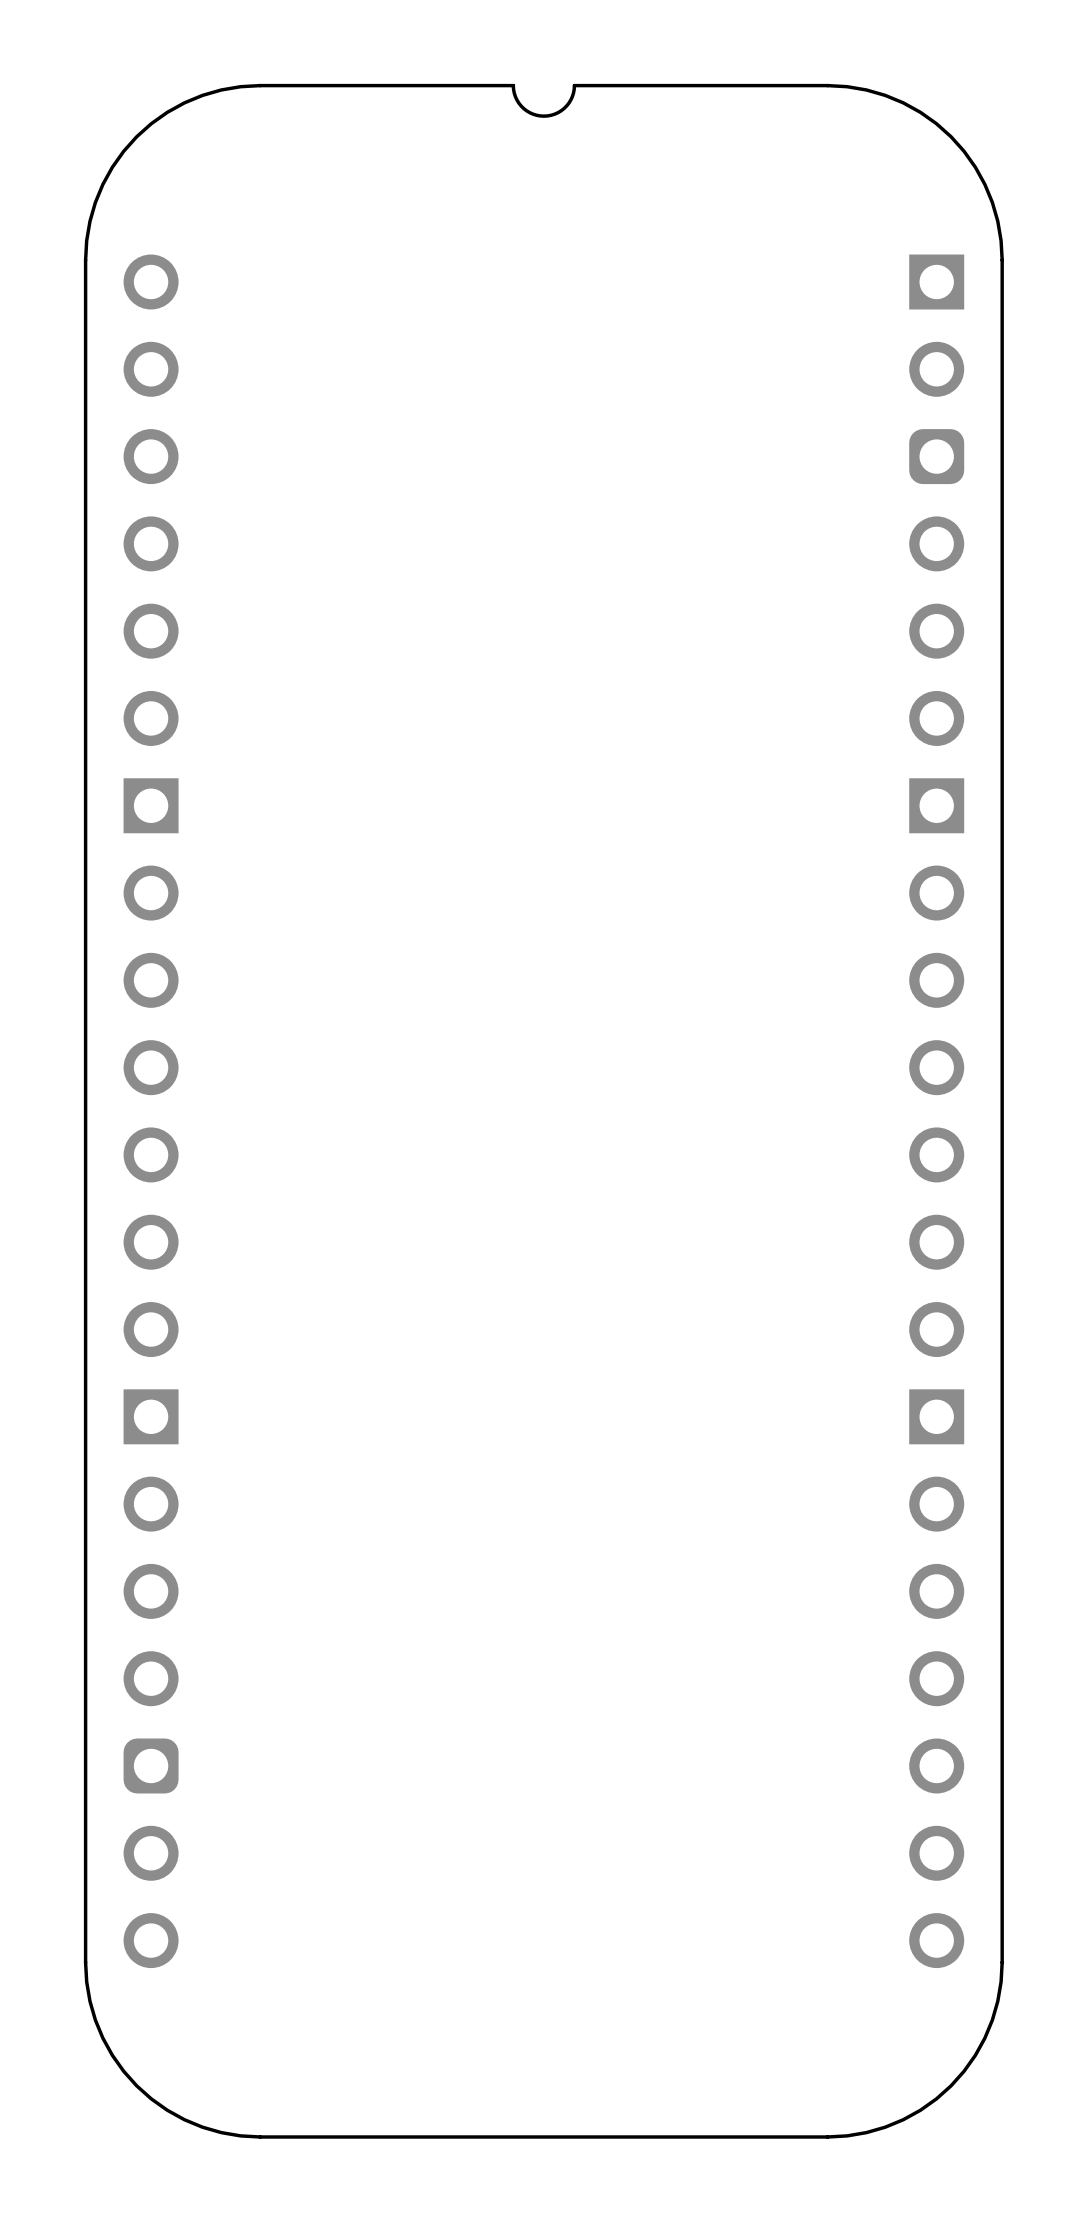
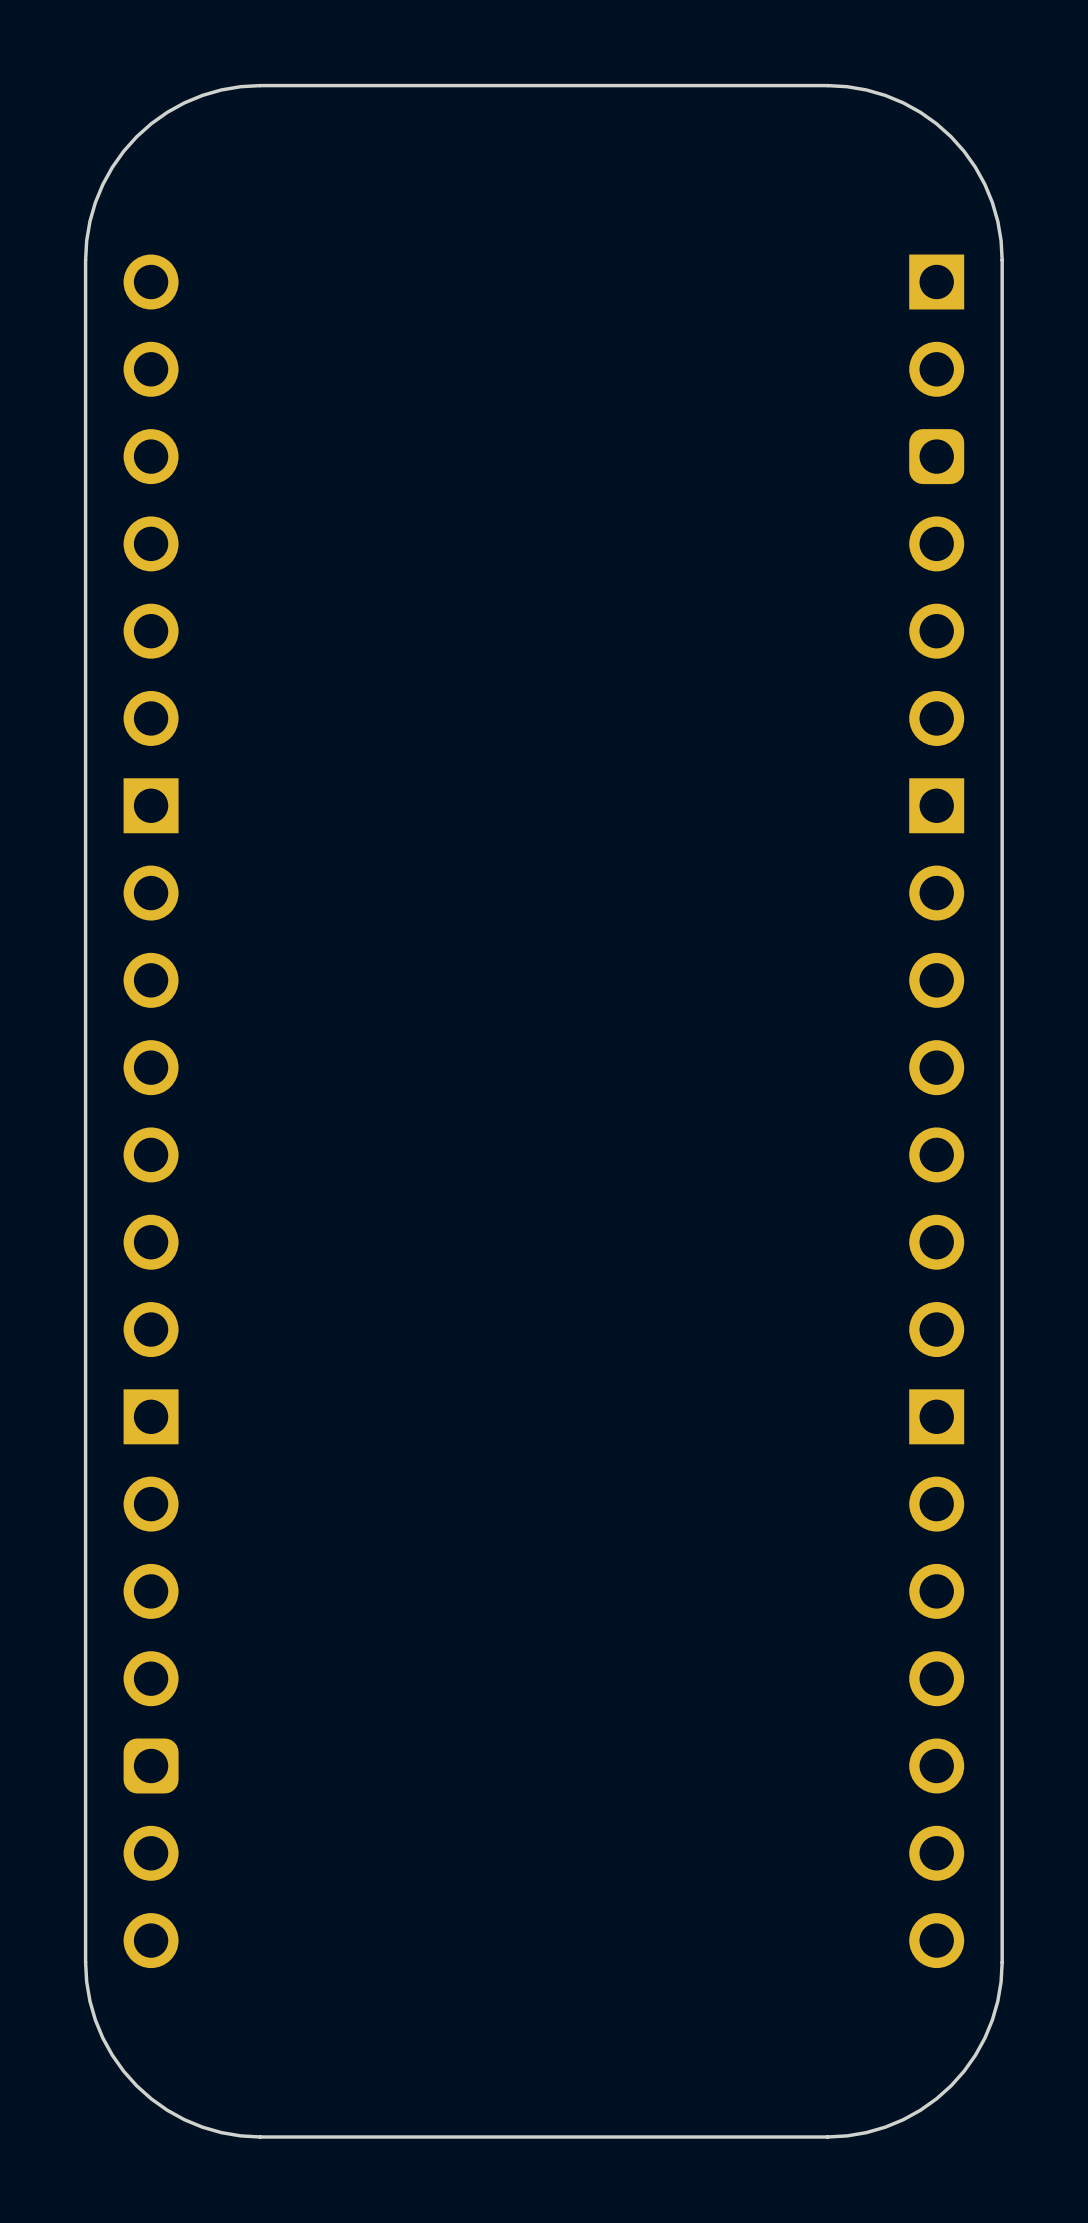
part footprint: [83, 83, 1004, 2139] -> [83, 83, 1004, 2139]

